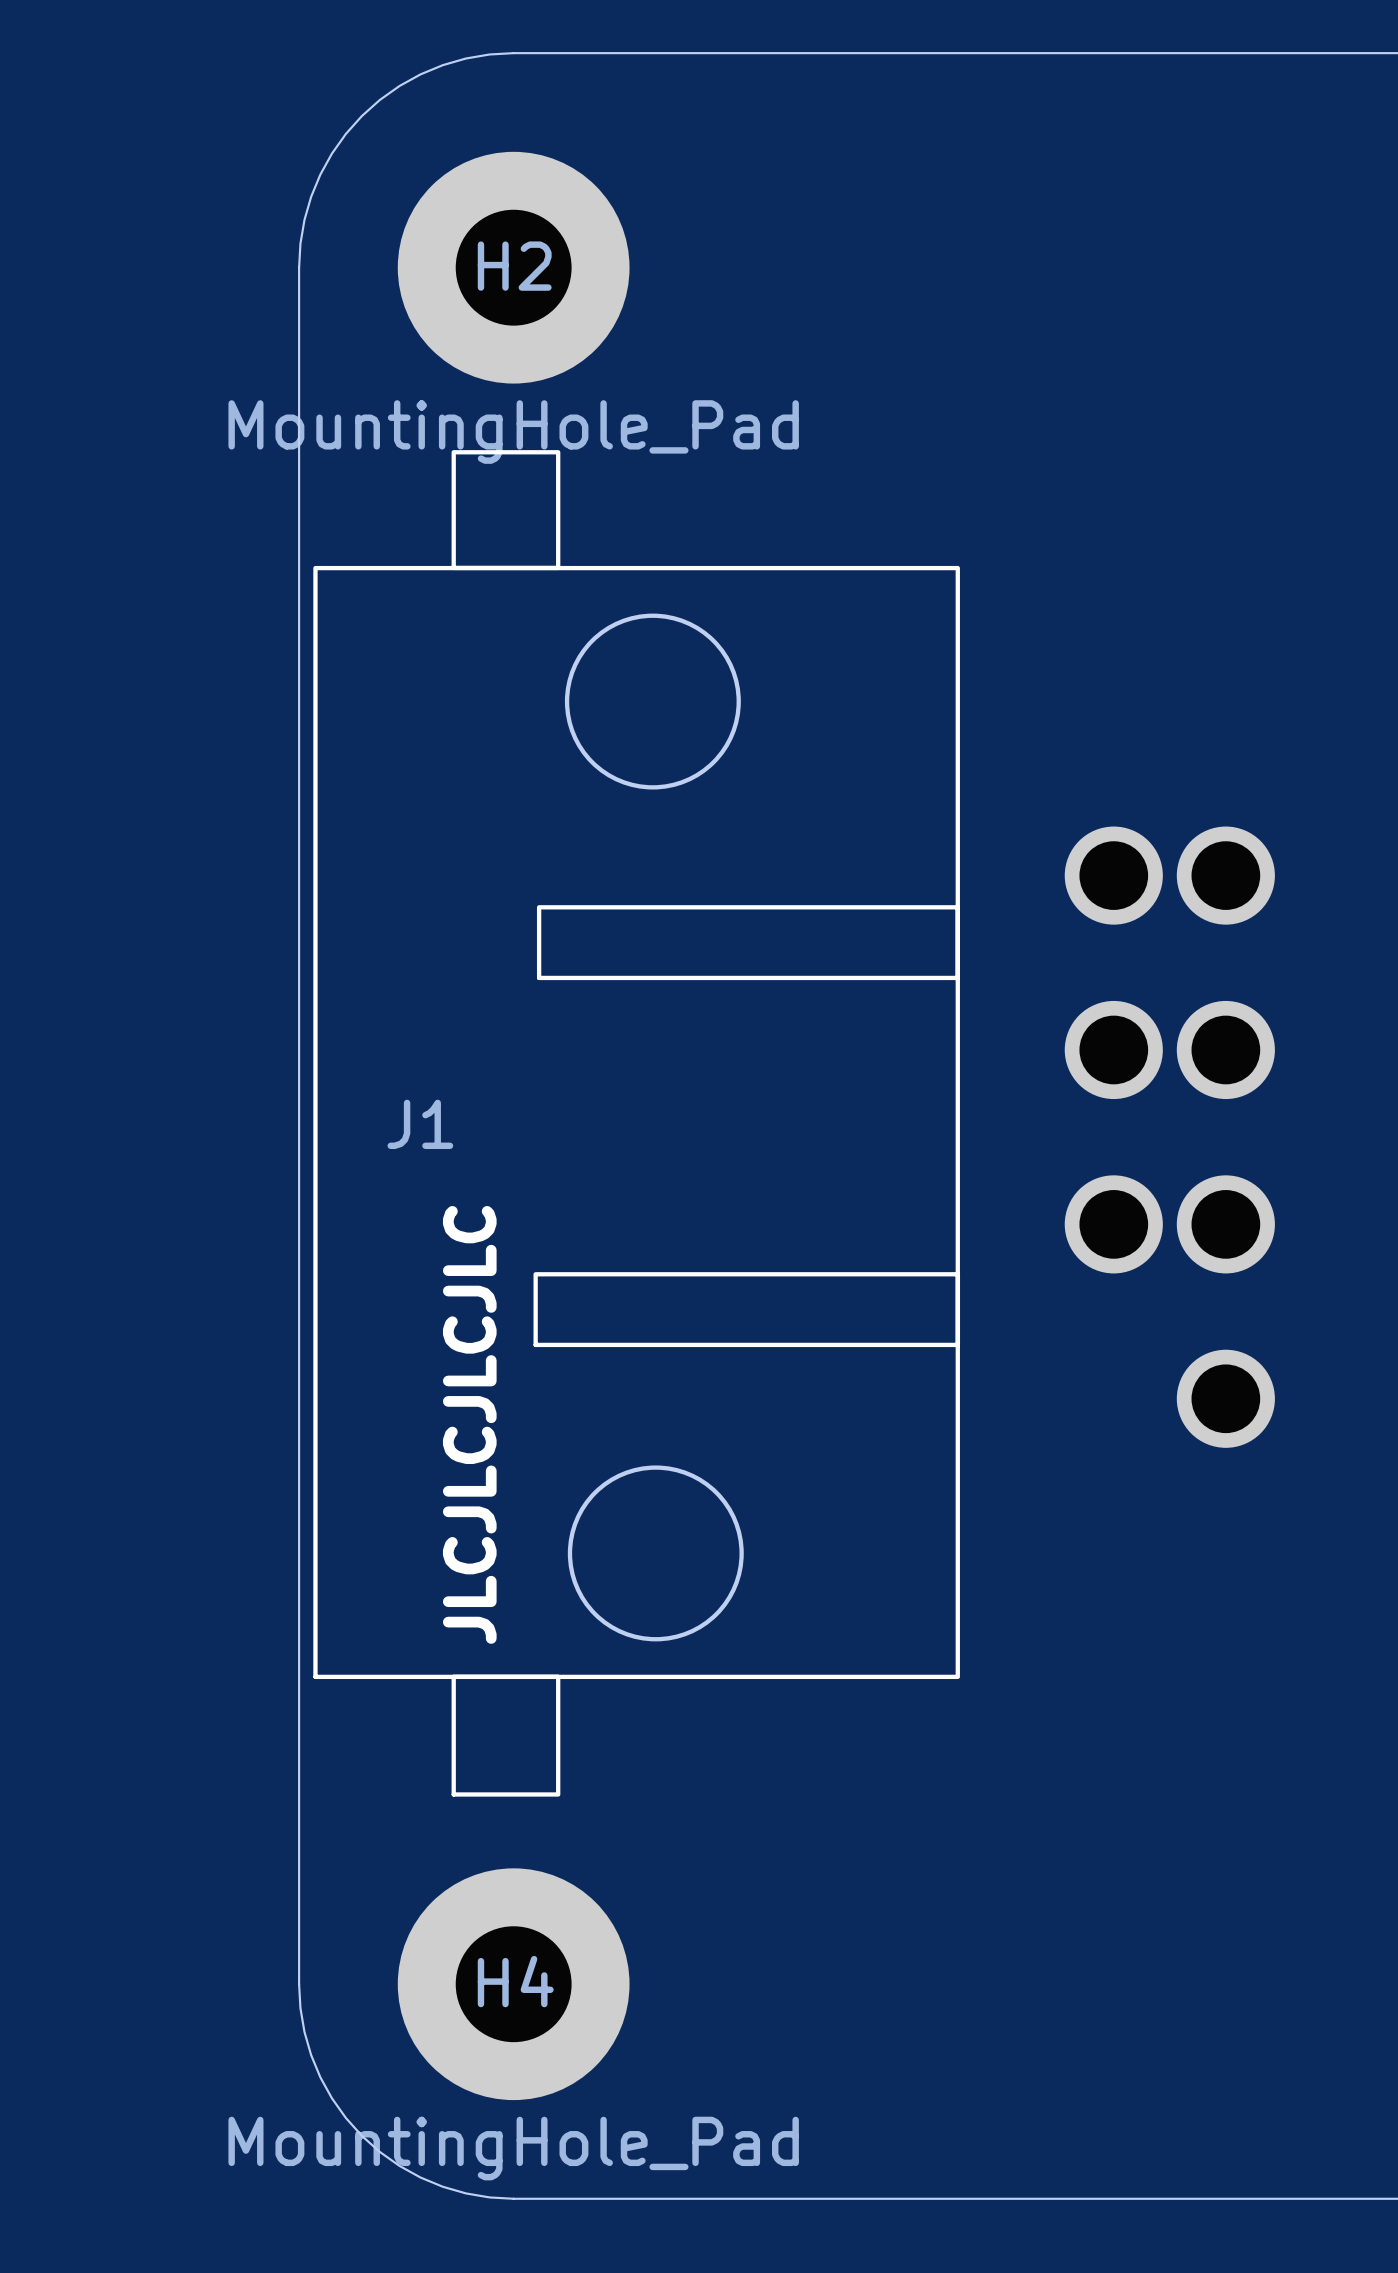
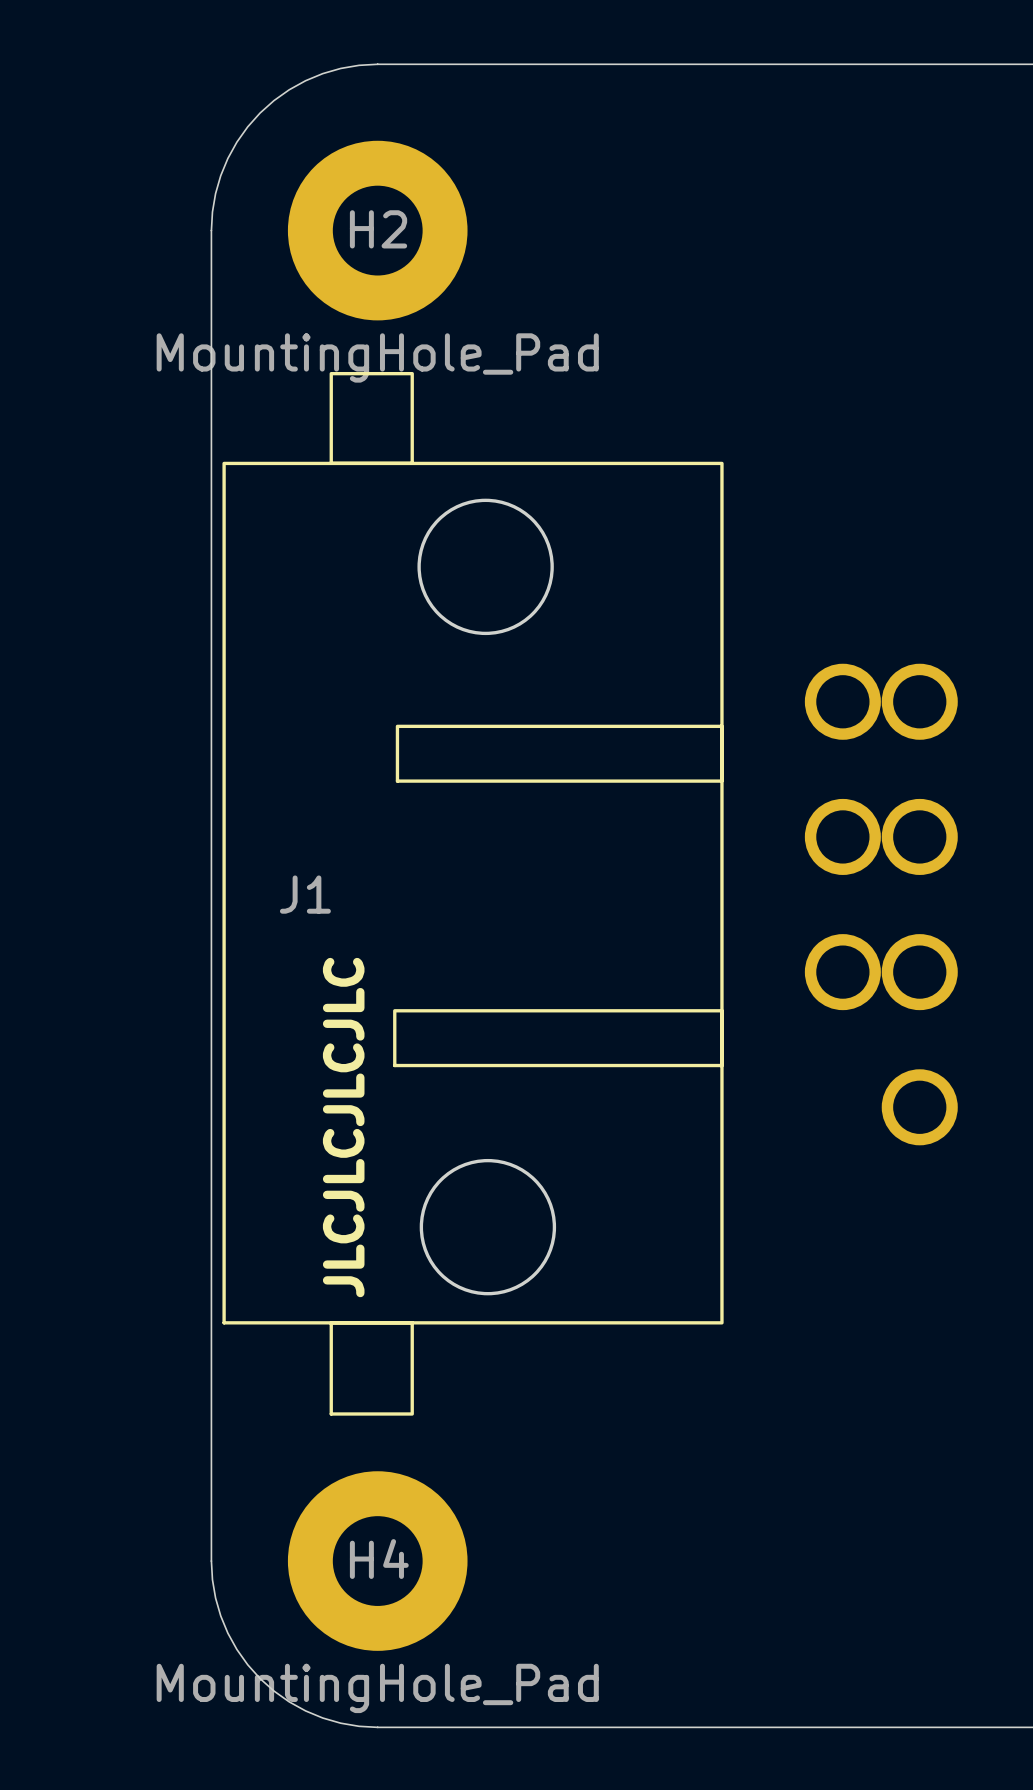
J1 footprint: [313, 450, 1275, 1797] -> [222, 371, 958, 1416]

